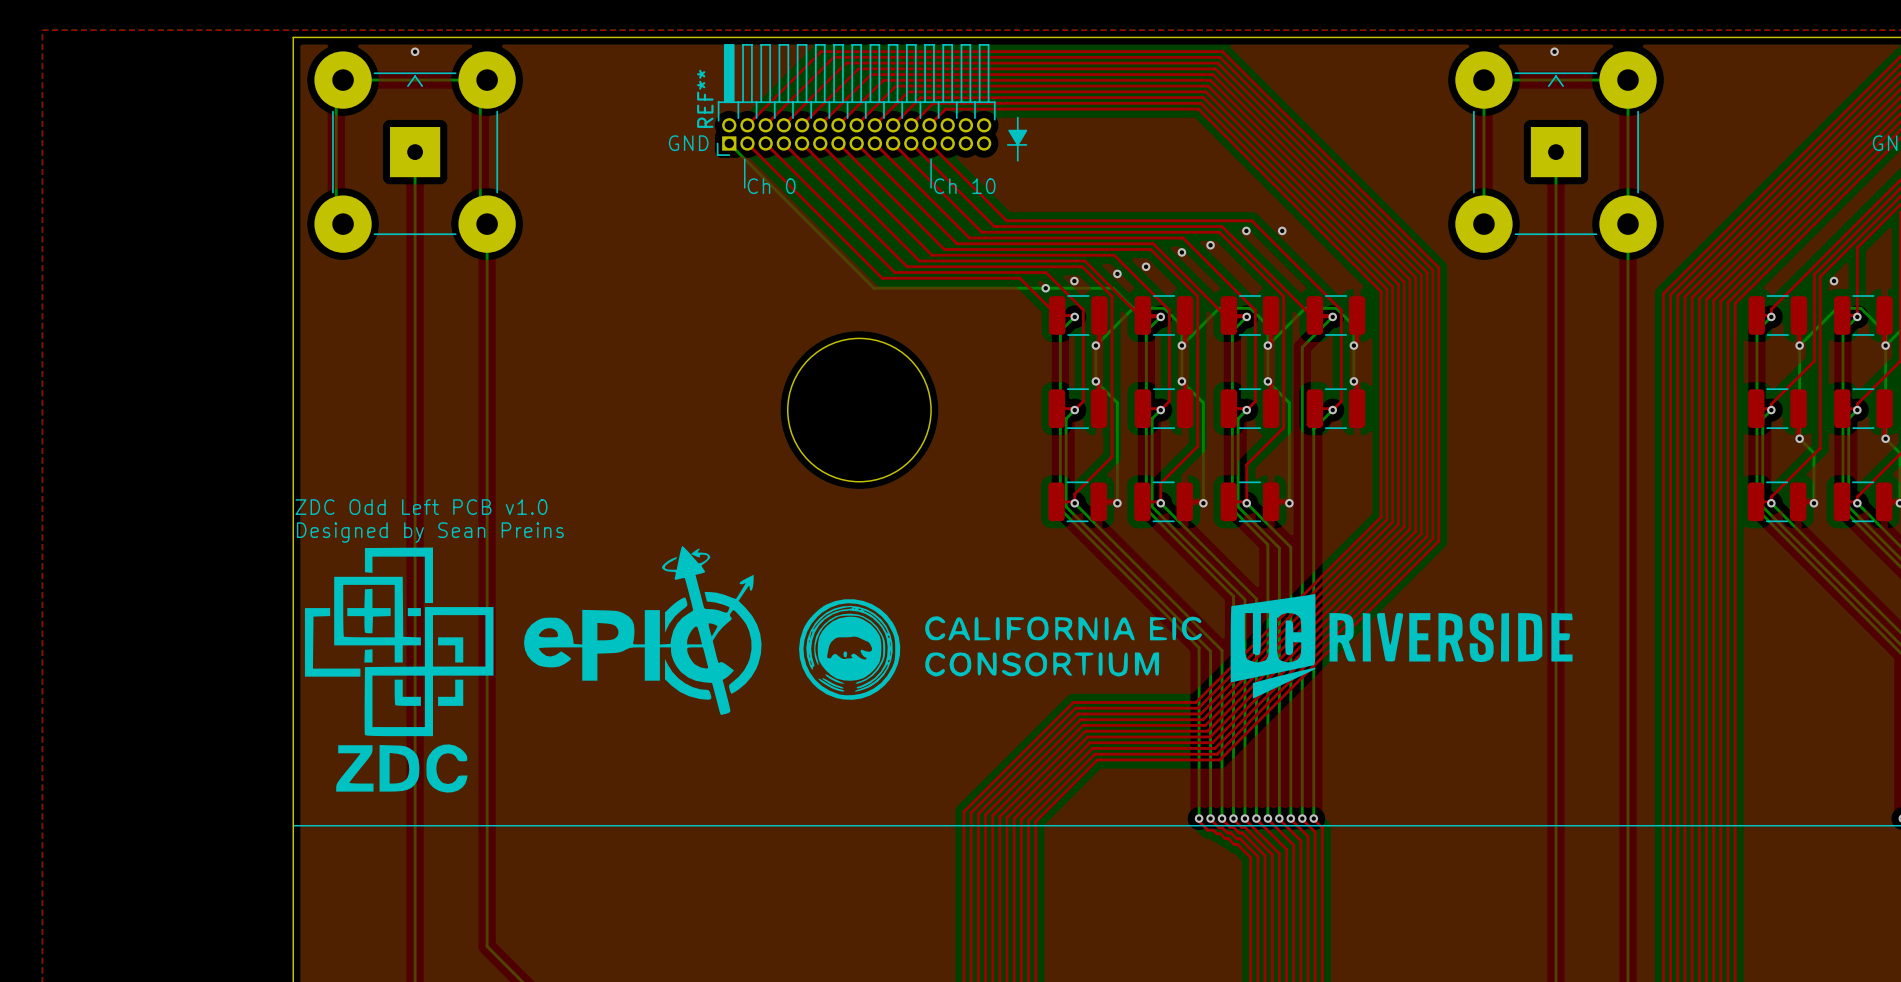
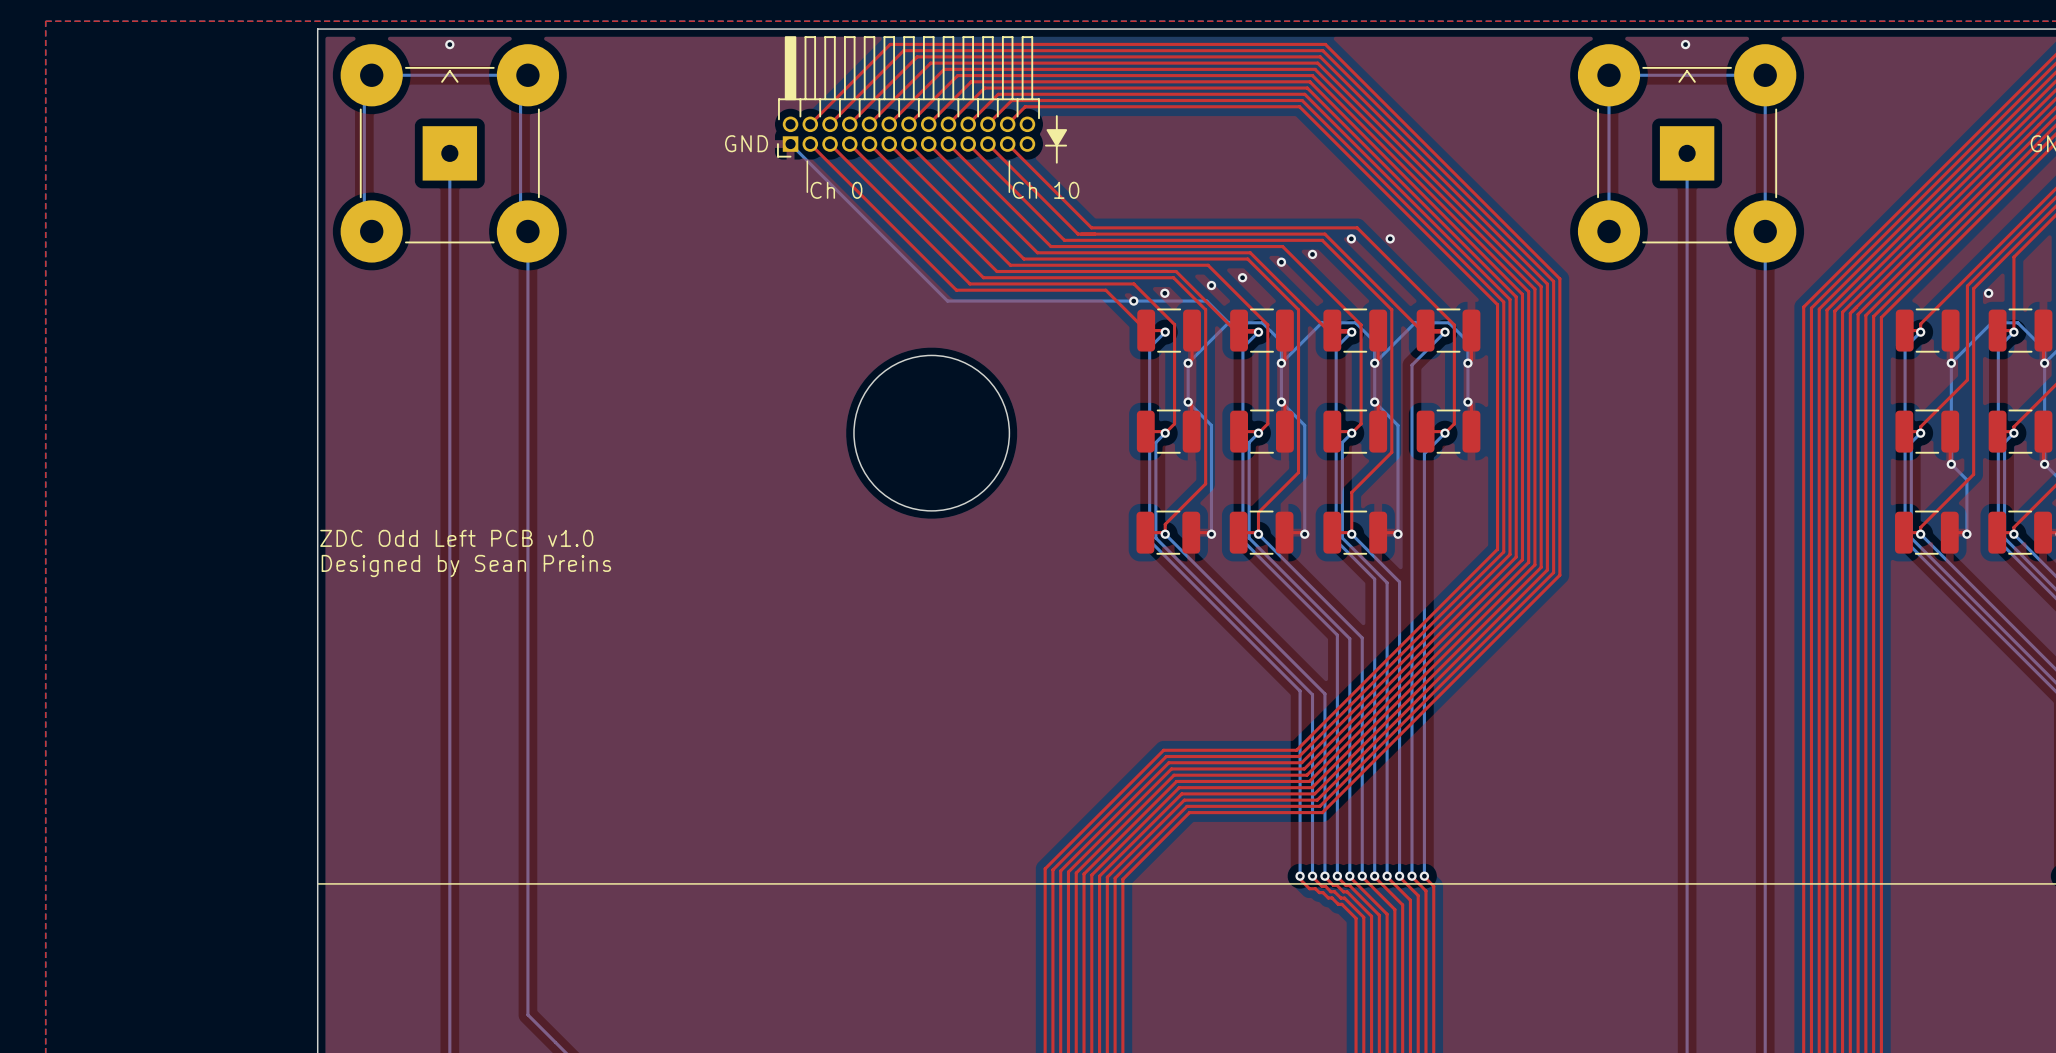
part: none -> (908, 96)
REF**: (856, 99) -> none
drawing position: (1017, 139) -> (1056, 139)
drawing: [304, 545, 1573, 793] -> none

